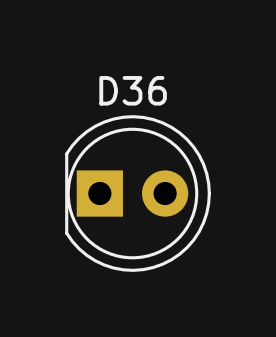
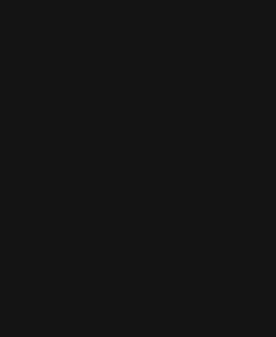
D36: (138, 193) -> none

